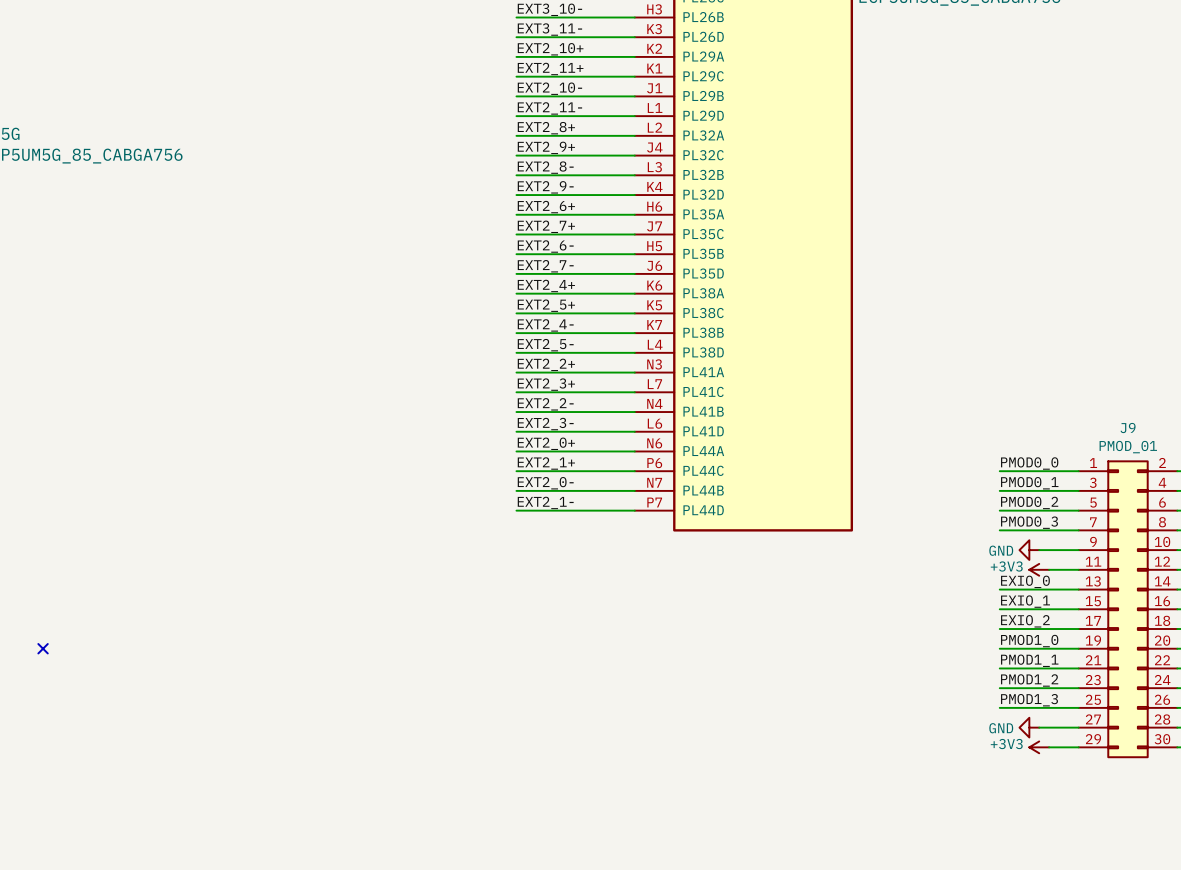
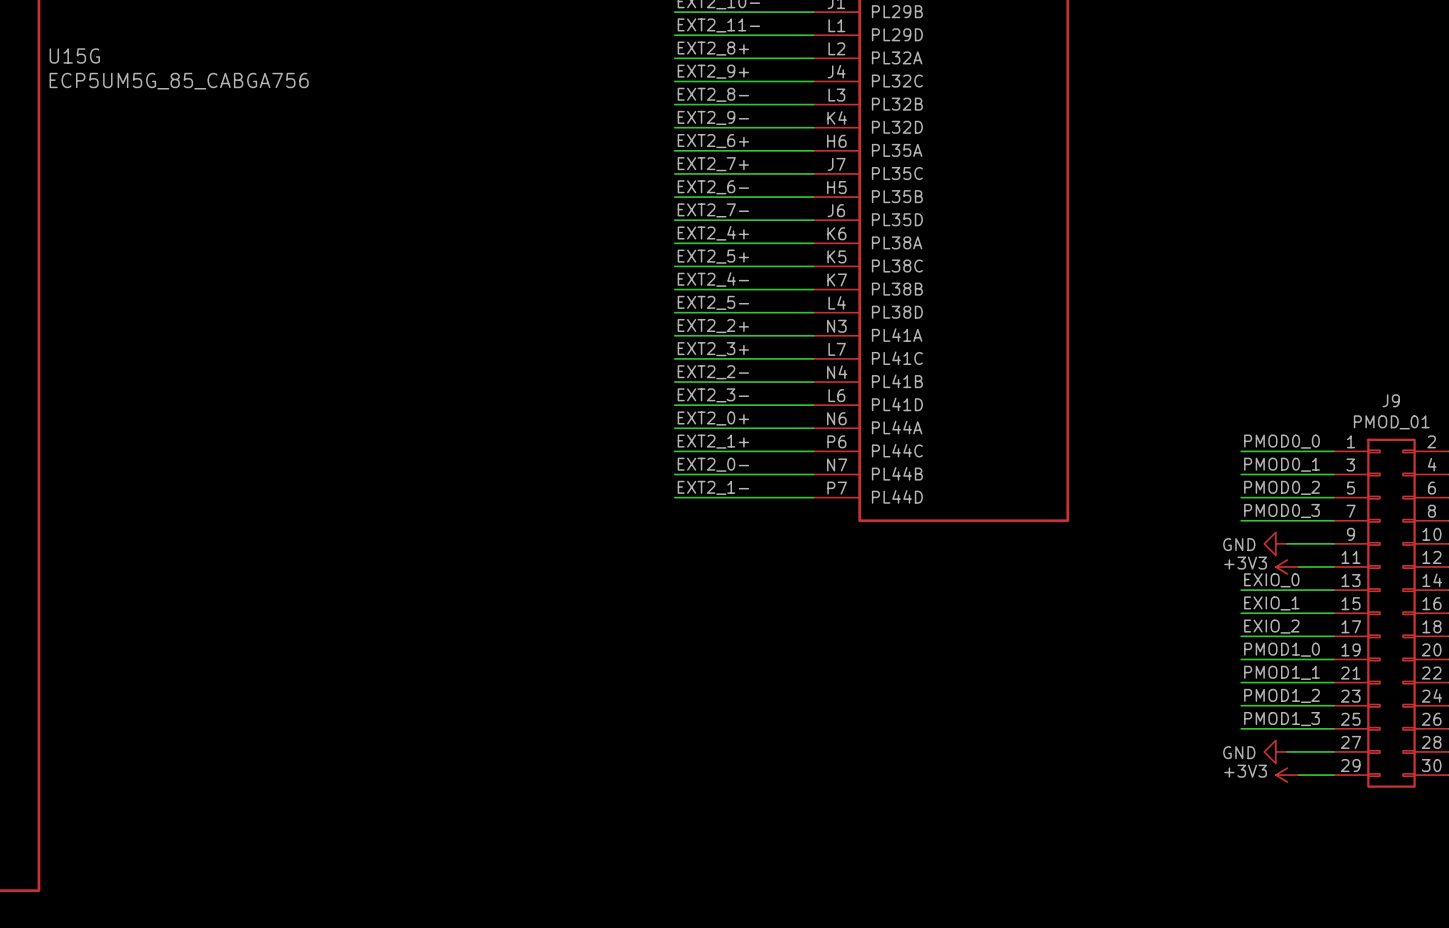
no-connect mark: (43, 648) -> none

